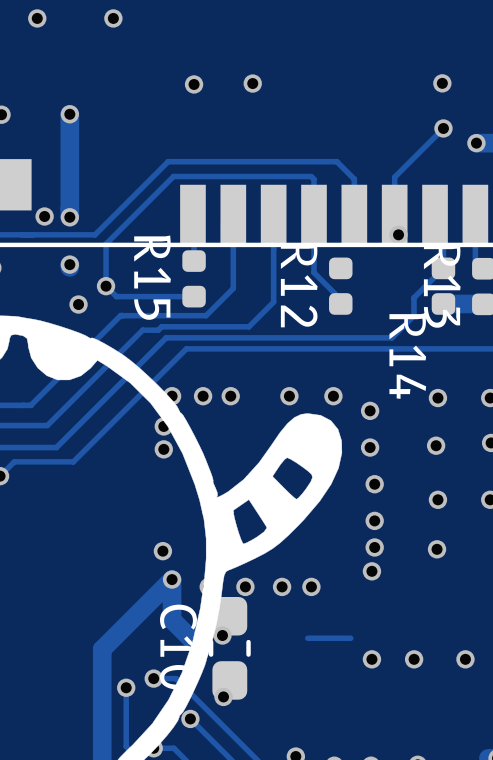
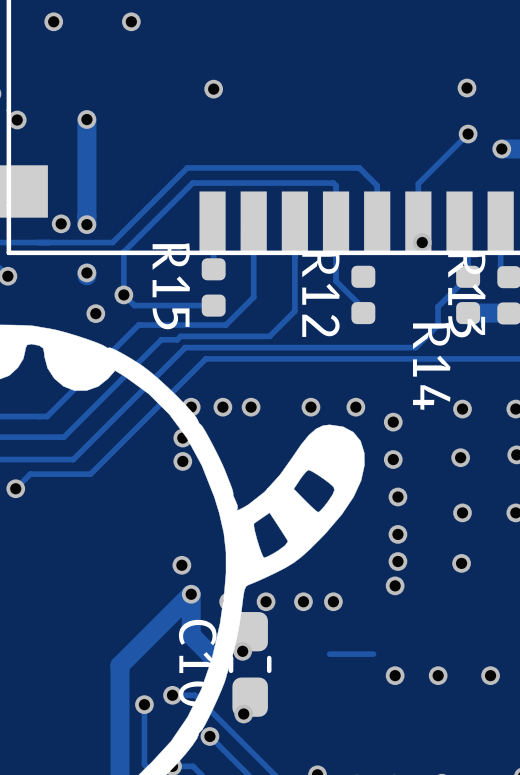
via: (252, 83) -> none

